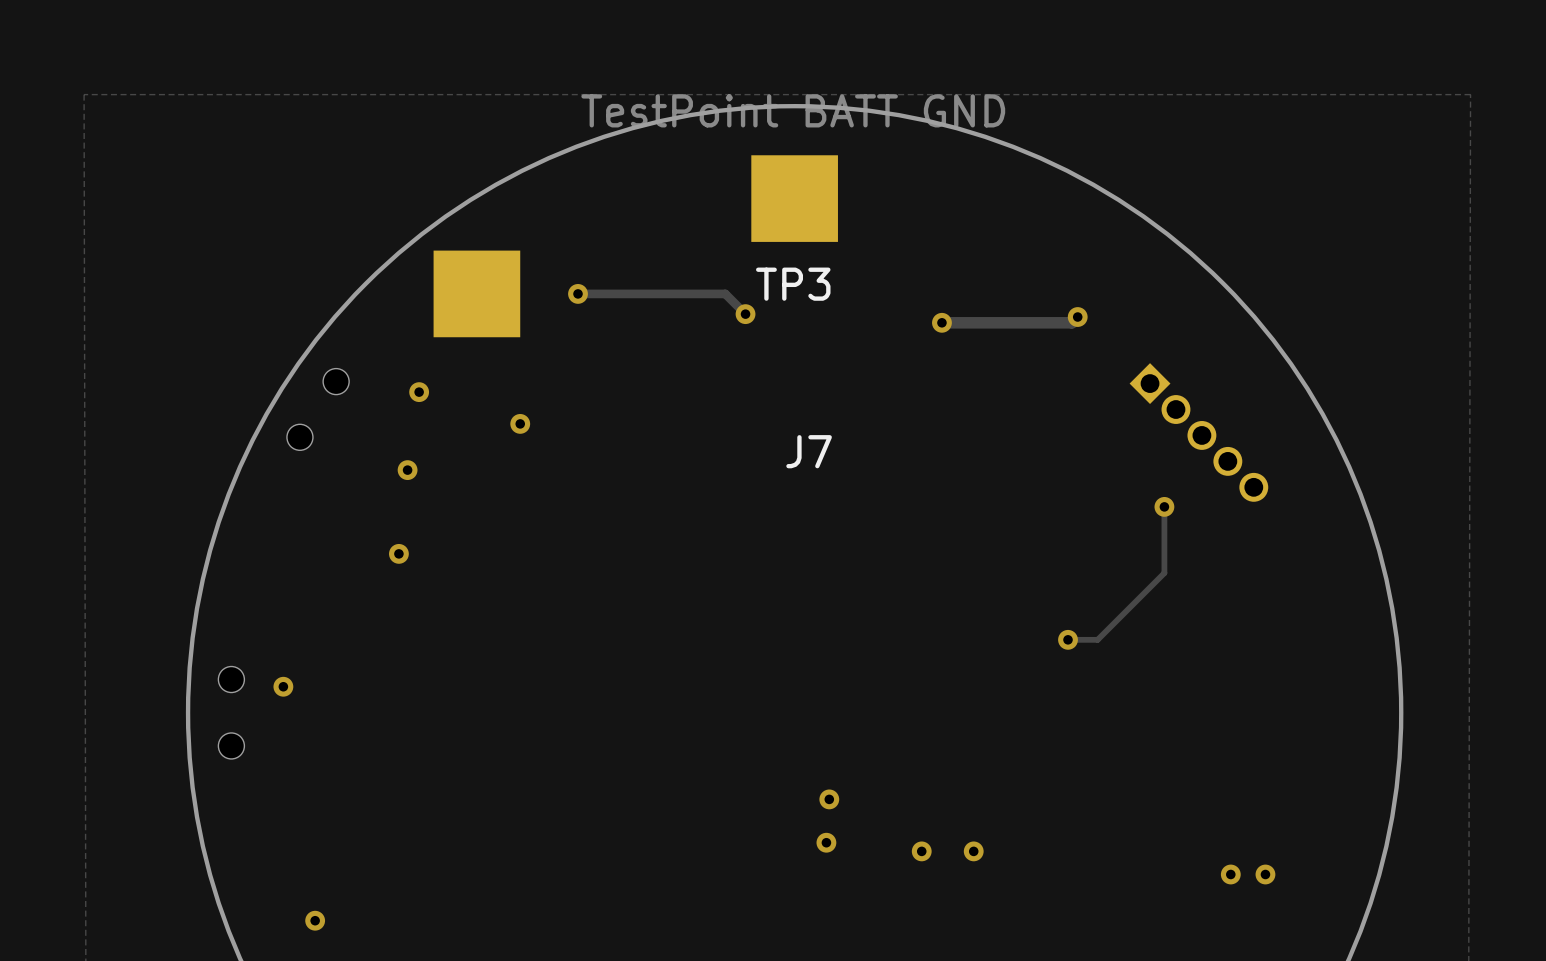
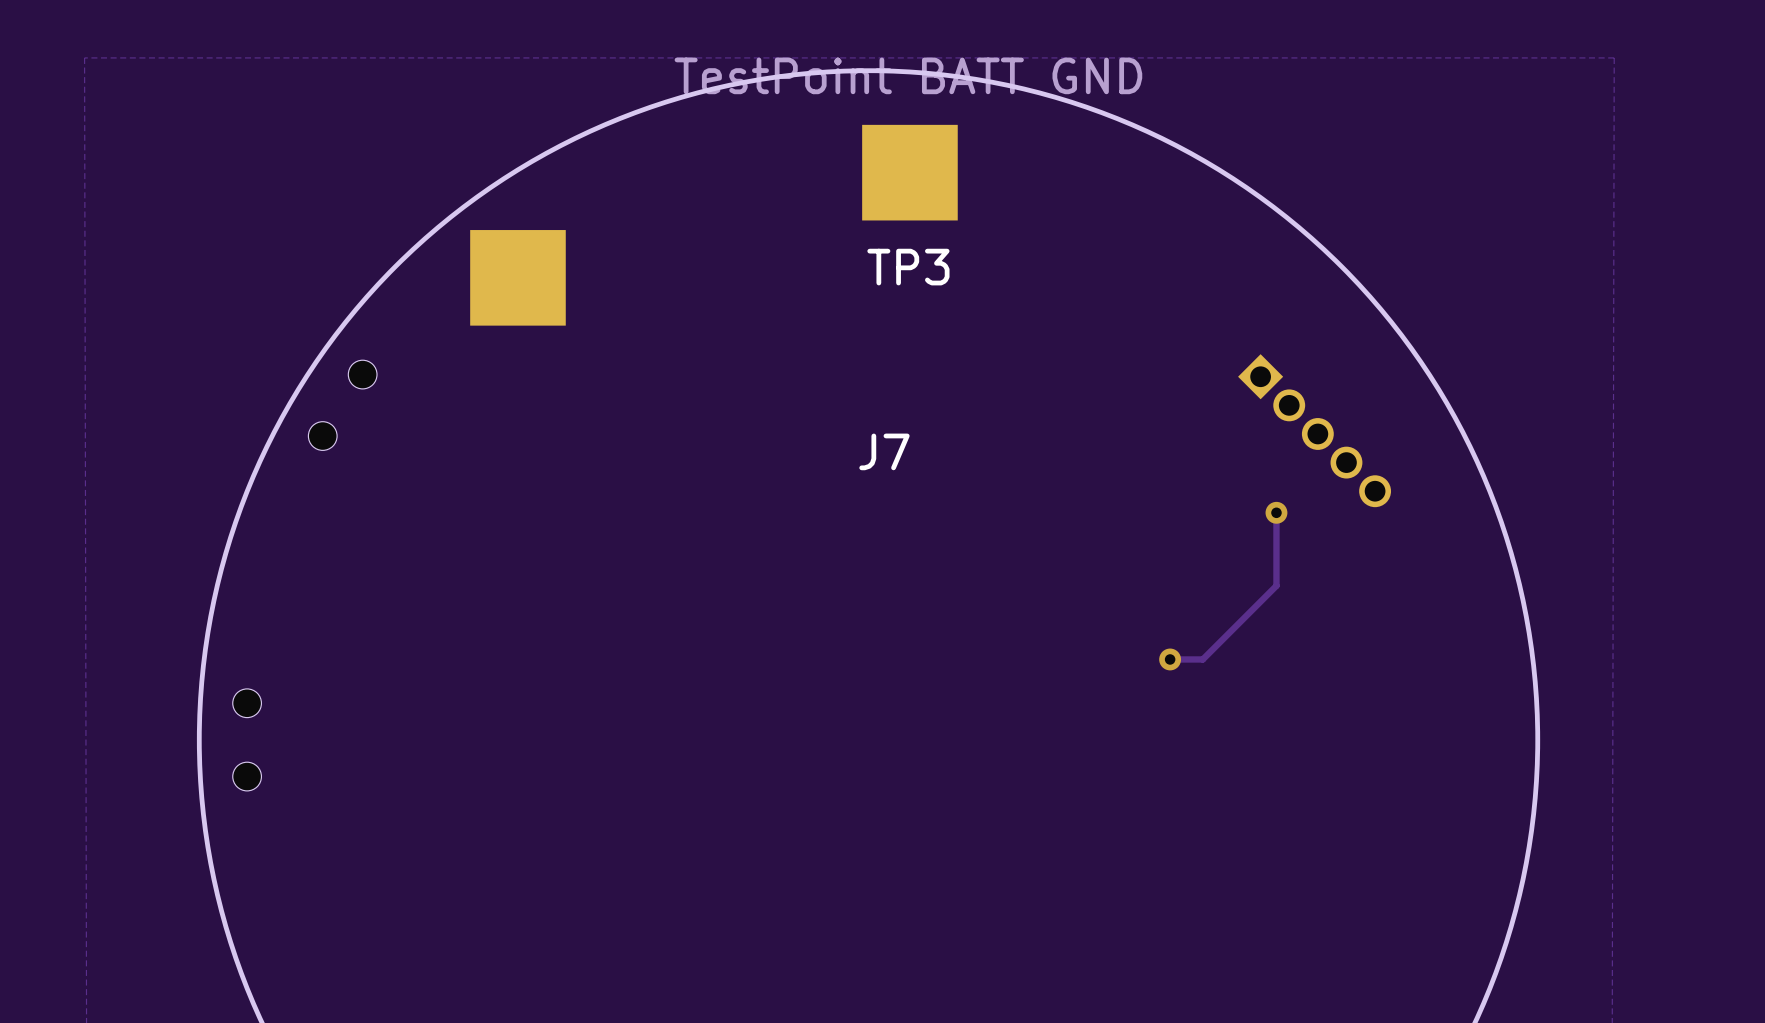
TP3 position: (794, 198) -> (909, 172)
track: (578, 293) (725, 293) (745, 314) -> none
via: (578, 293) -> none
via: (745, 314) -> none
track: (1077, 317) (1071, 322) (941, 322) -> none
via: (1077, 317) -> none
via: (941, 322) -> none
via: (419, 392) -> none
via: (520, 423) -> none
via: (407, 470) -> none
via: (398, 553) -> none
via: (283, 686) -> none
via: (829, 799) -> none
via: (826, 842) -> none
via: (921, 851) -> none
via: (973, 851) -> none
via: (1230, 874) -> none
via: (1265, 874) -> none
via: (315, 920) -> none

